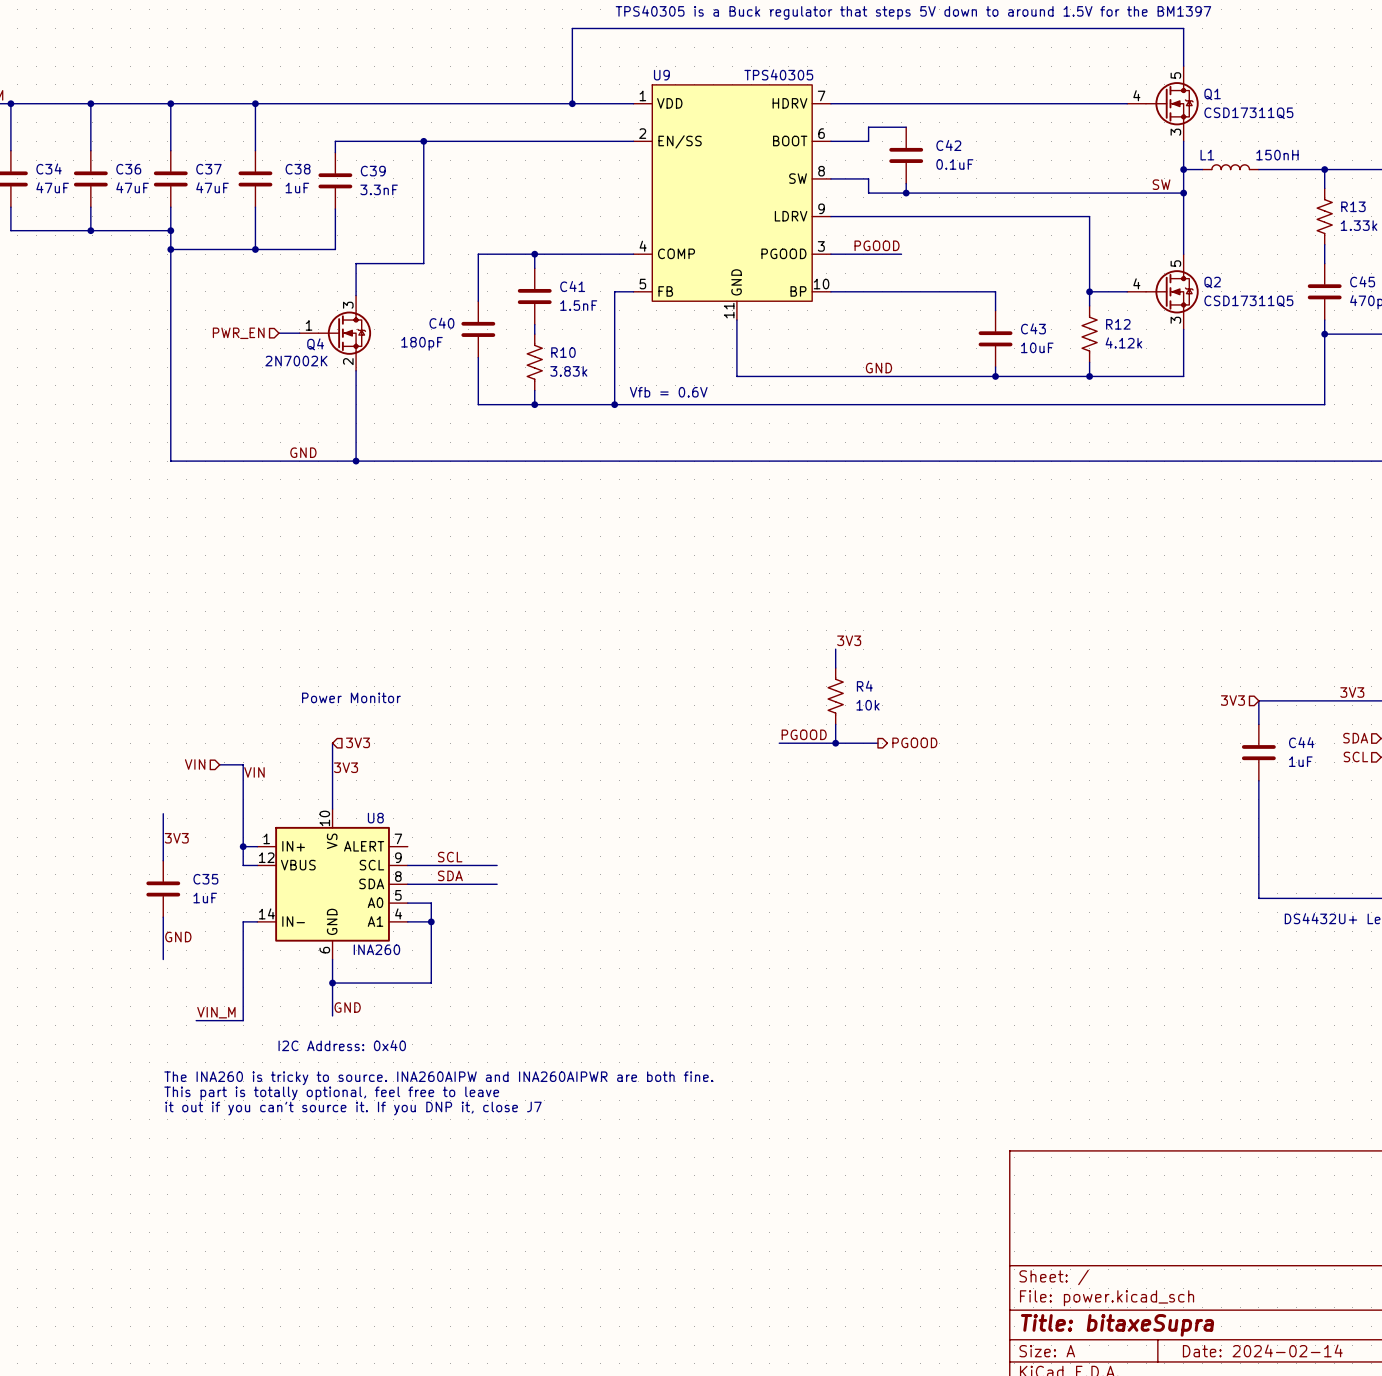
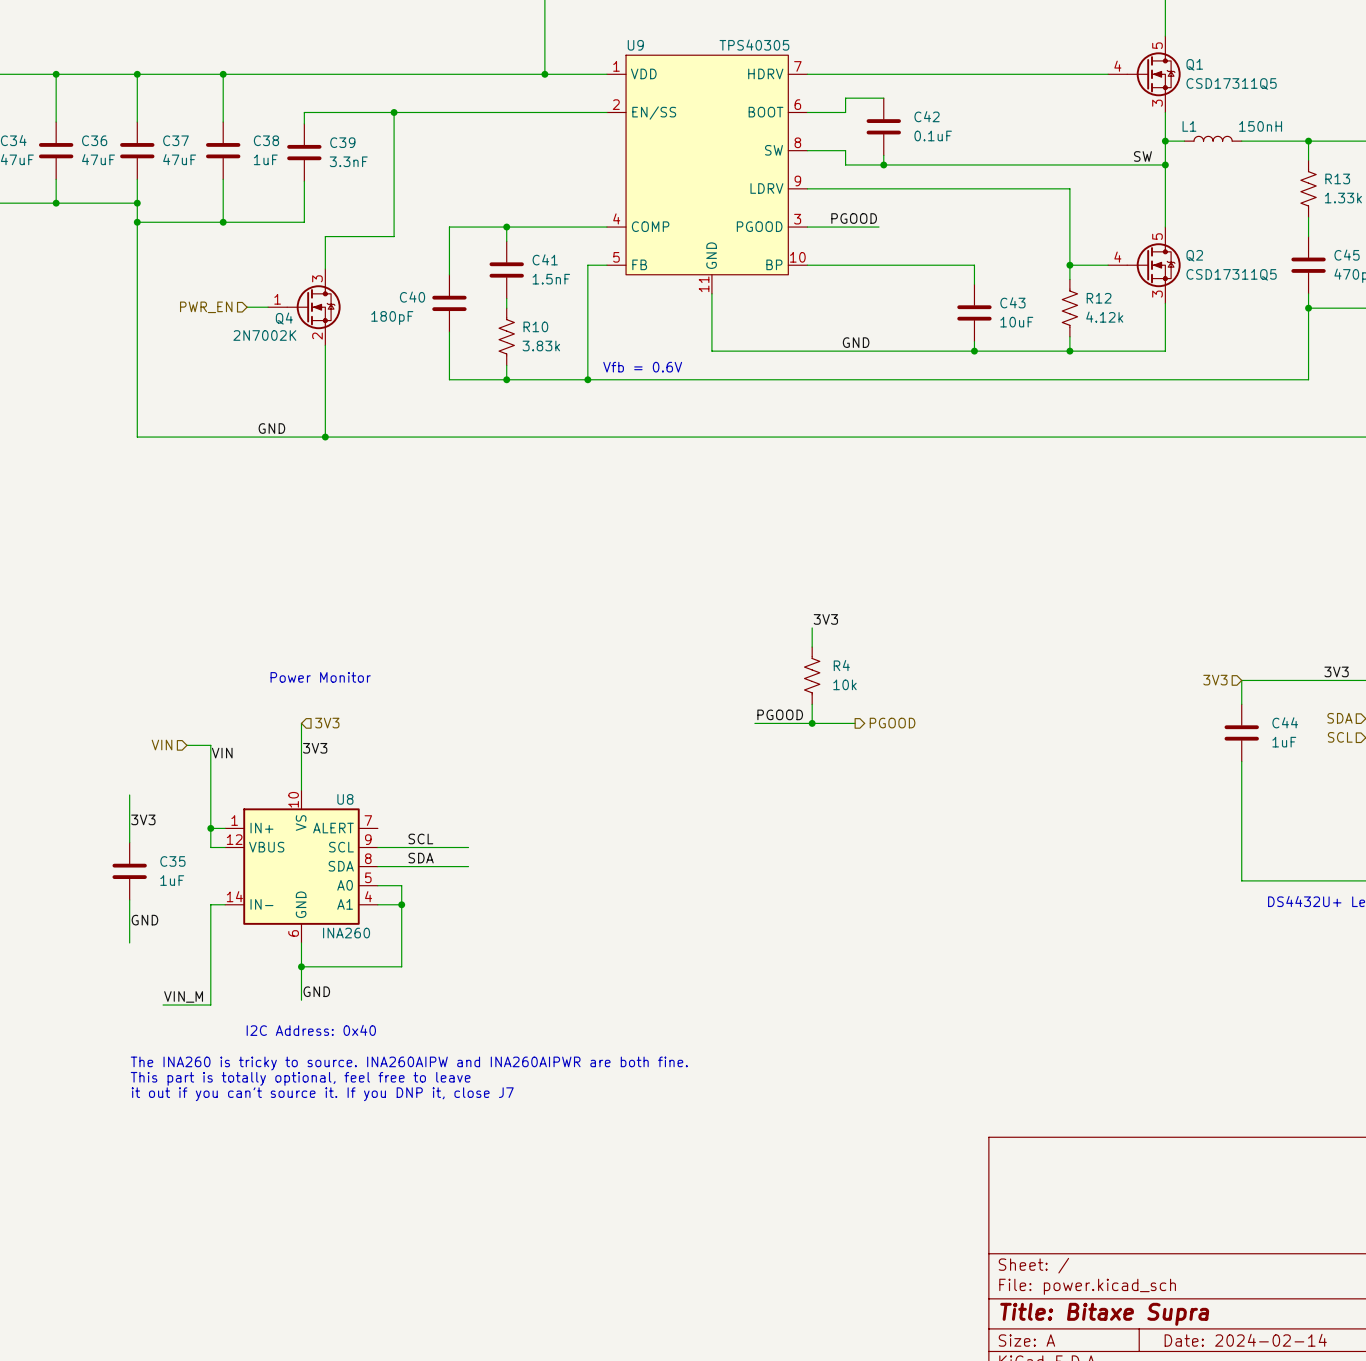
title block: Title: bitaxeSupra (1117, 1325) -> Title: Bitaxe Supra (1104, 1314)

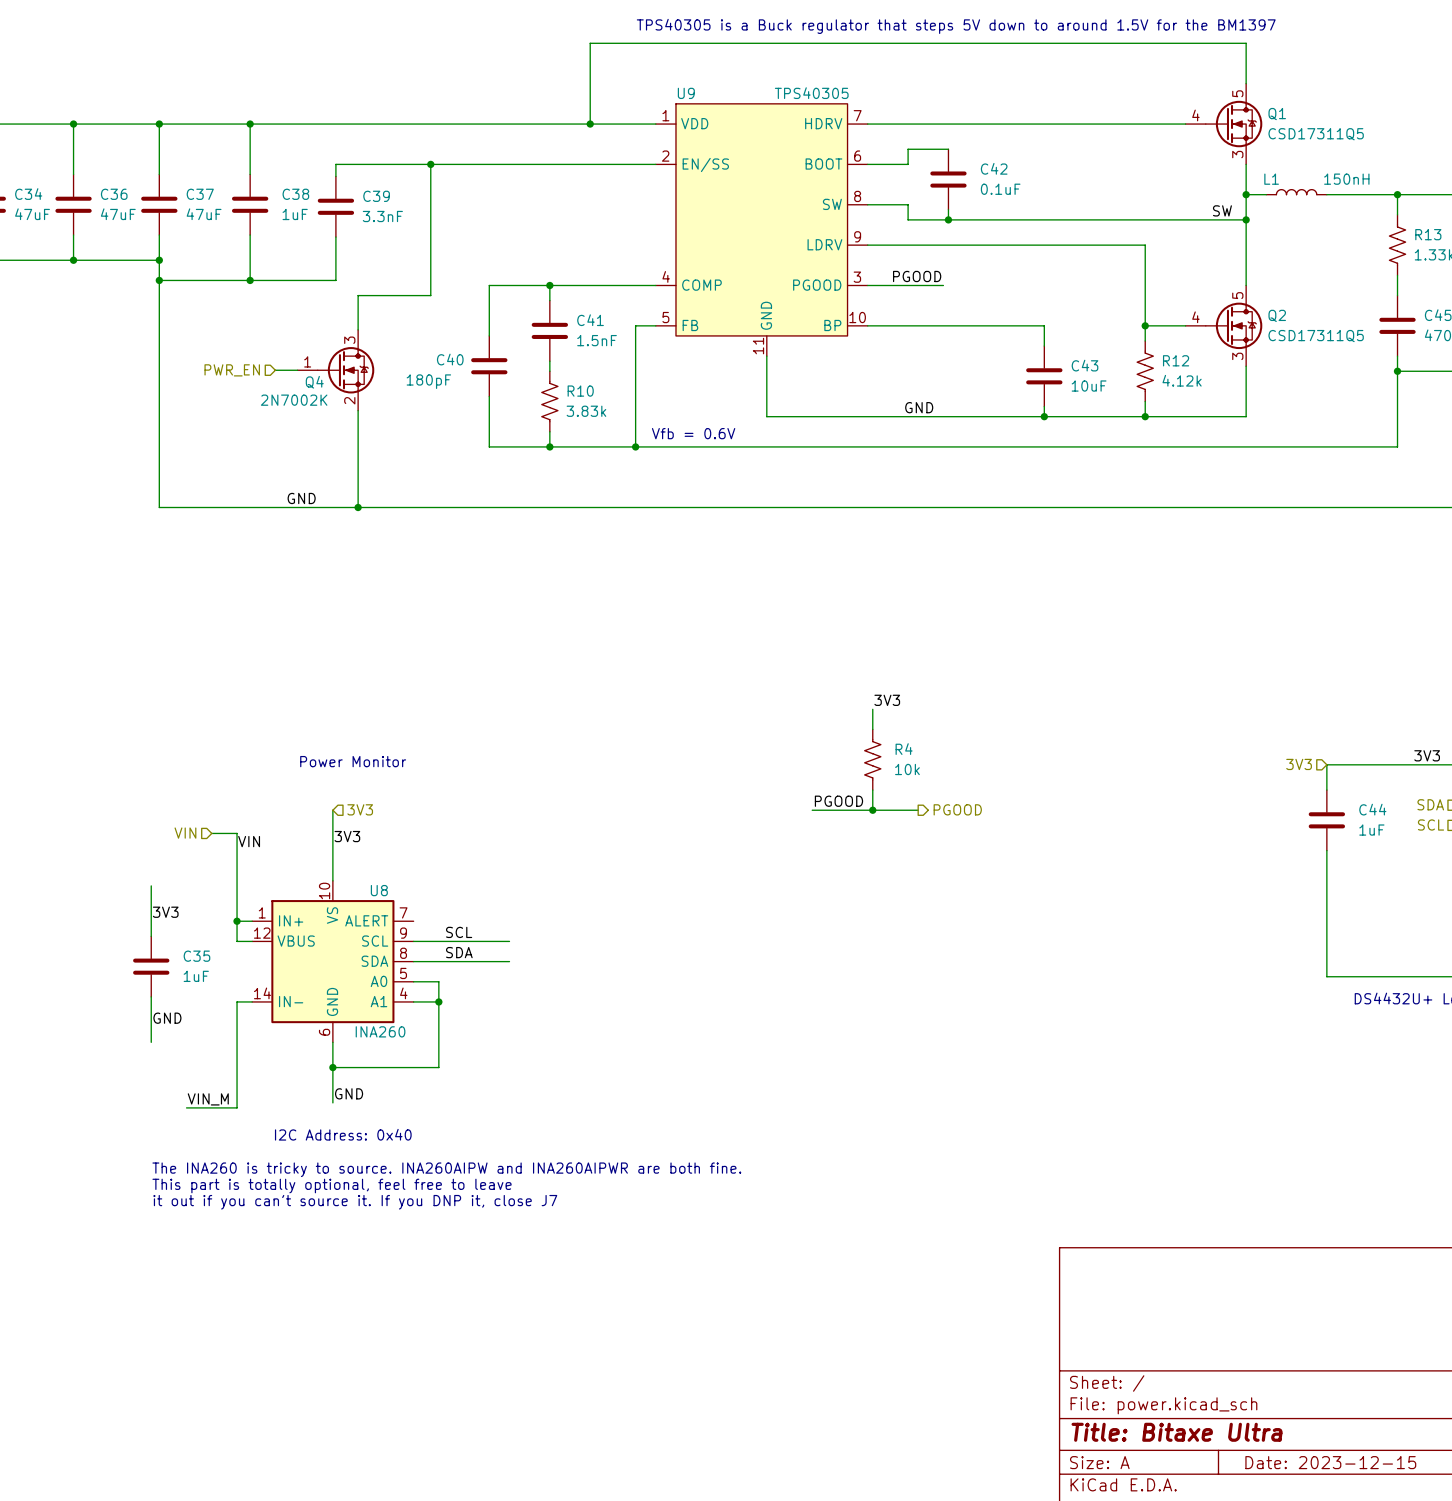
title block: Title: Bitaxe Supra (1104, 1314) -> Title: Bitaxe Ultra (1177, 1432)
title block: Date: 2024-02-14 (1245, 1340) -> Date: 2023-12-15 (1330, 1462)

